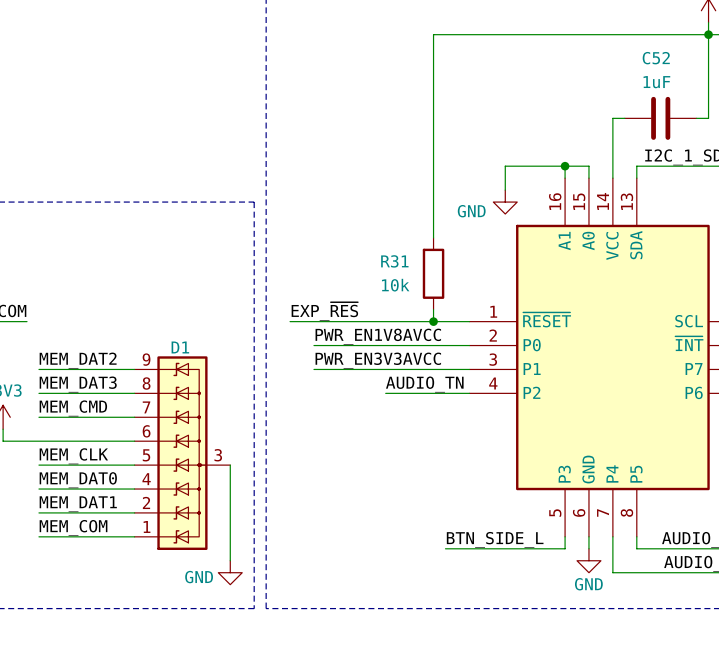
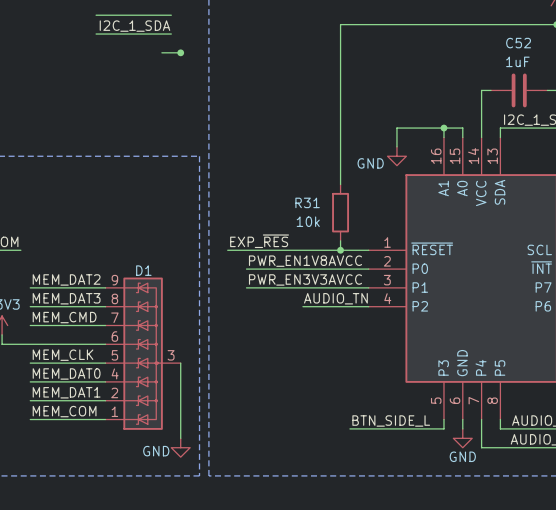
wire: none -> (96, 15) (171, 15)
label: none -> I2C_1_SDA (134, 26)
wire: none -> (96, 34) (171, 34)
wire: none -> (161, 52) (180, 52)
junction: none -> (180, 52)

